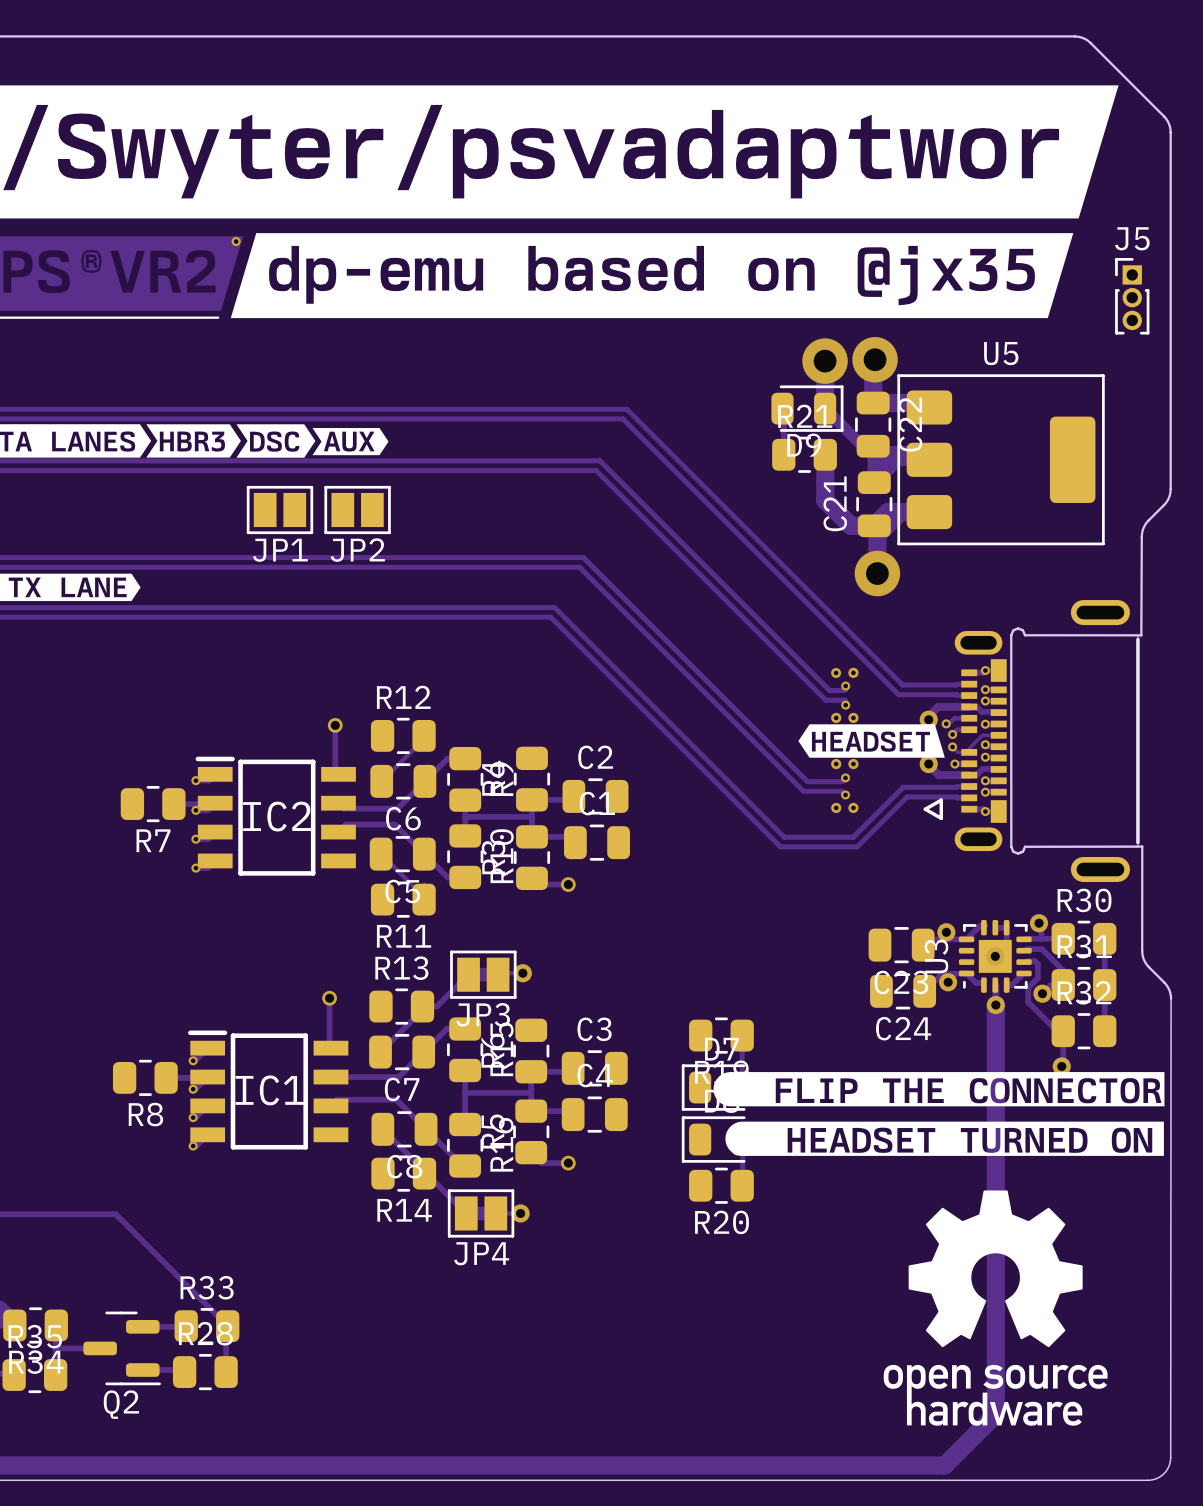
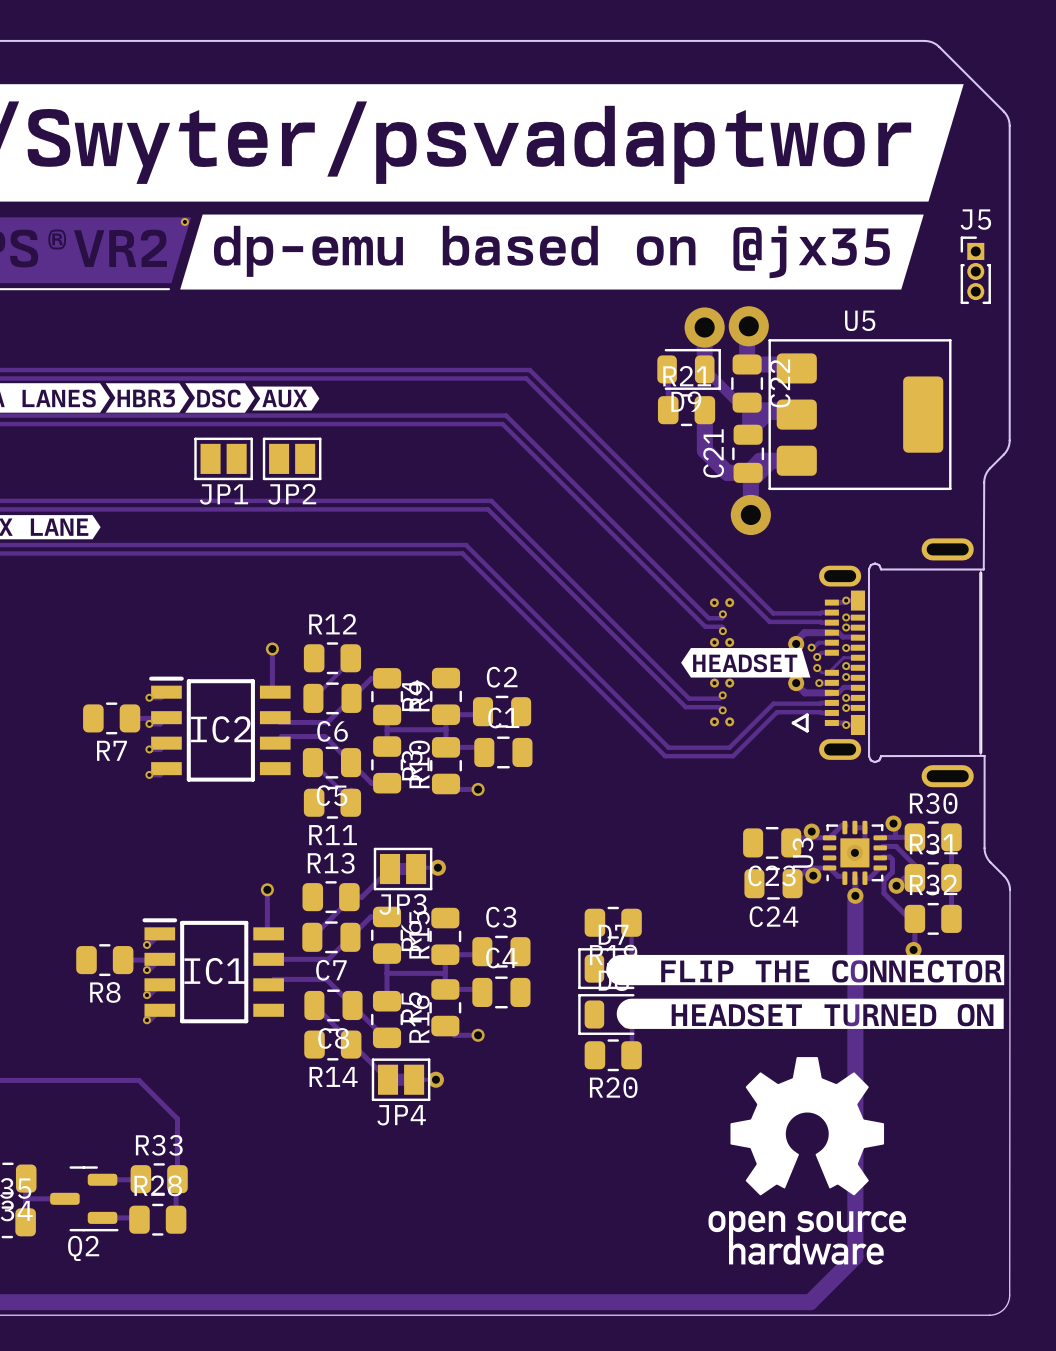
track: (115, 1214) (227, 1326) -> (78, 1080) (138, 1080) (177, 1118) (177, 1179)
drawing position: (995, 1268) -> (807, 1126)
drawing: none -> [708, 1211, 726, 1233]
drawing: none -> [816, 1211, 867, 1265]
drawing shape: [883, 1364, 903, 1389] -> [748, 1211, 766, 1233]
drawing: [928, 1364, 969, 1426] -> none
drawing shape: [1005, 1364, 1026, 1389] -> [857, 1211, 872, 1232]
drawing: [1047, 1364, 1108, 1426] -> none
drawing shape: [1052, 1364, 1069, 1389] -> [889, 1211, 907, 1233]
drawing position: (961, 1376) -> (776, 1221)
drawing position: (993, 1376) -> (805, 1221)
drawing position: (1077, 1376) -> (879, 1221)
drawing position: (1038, 1377) -> (845, 1221)
drawing position: (916, 1395) -> (737, 1237)
drawing: none -> [748, 1243, 784, 1265]
drawing shape: [1023, 1401, 1043, 1426] -> [866, 1243, 884, 1265]
drawing position: (978, 1409) -> (791, 1250)
drawing position: (1006, 1413) -> (816, 1254)

